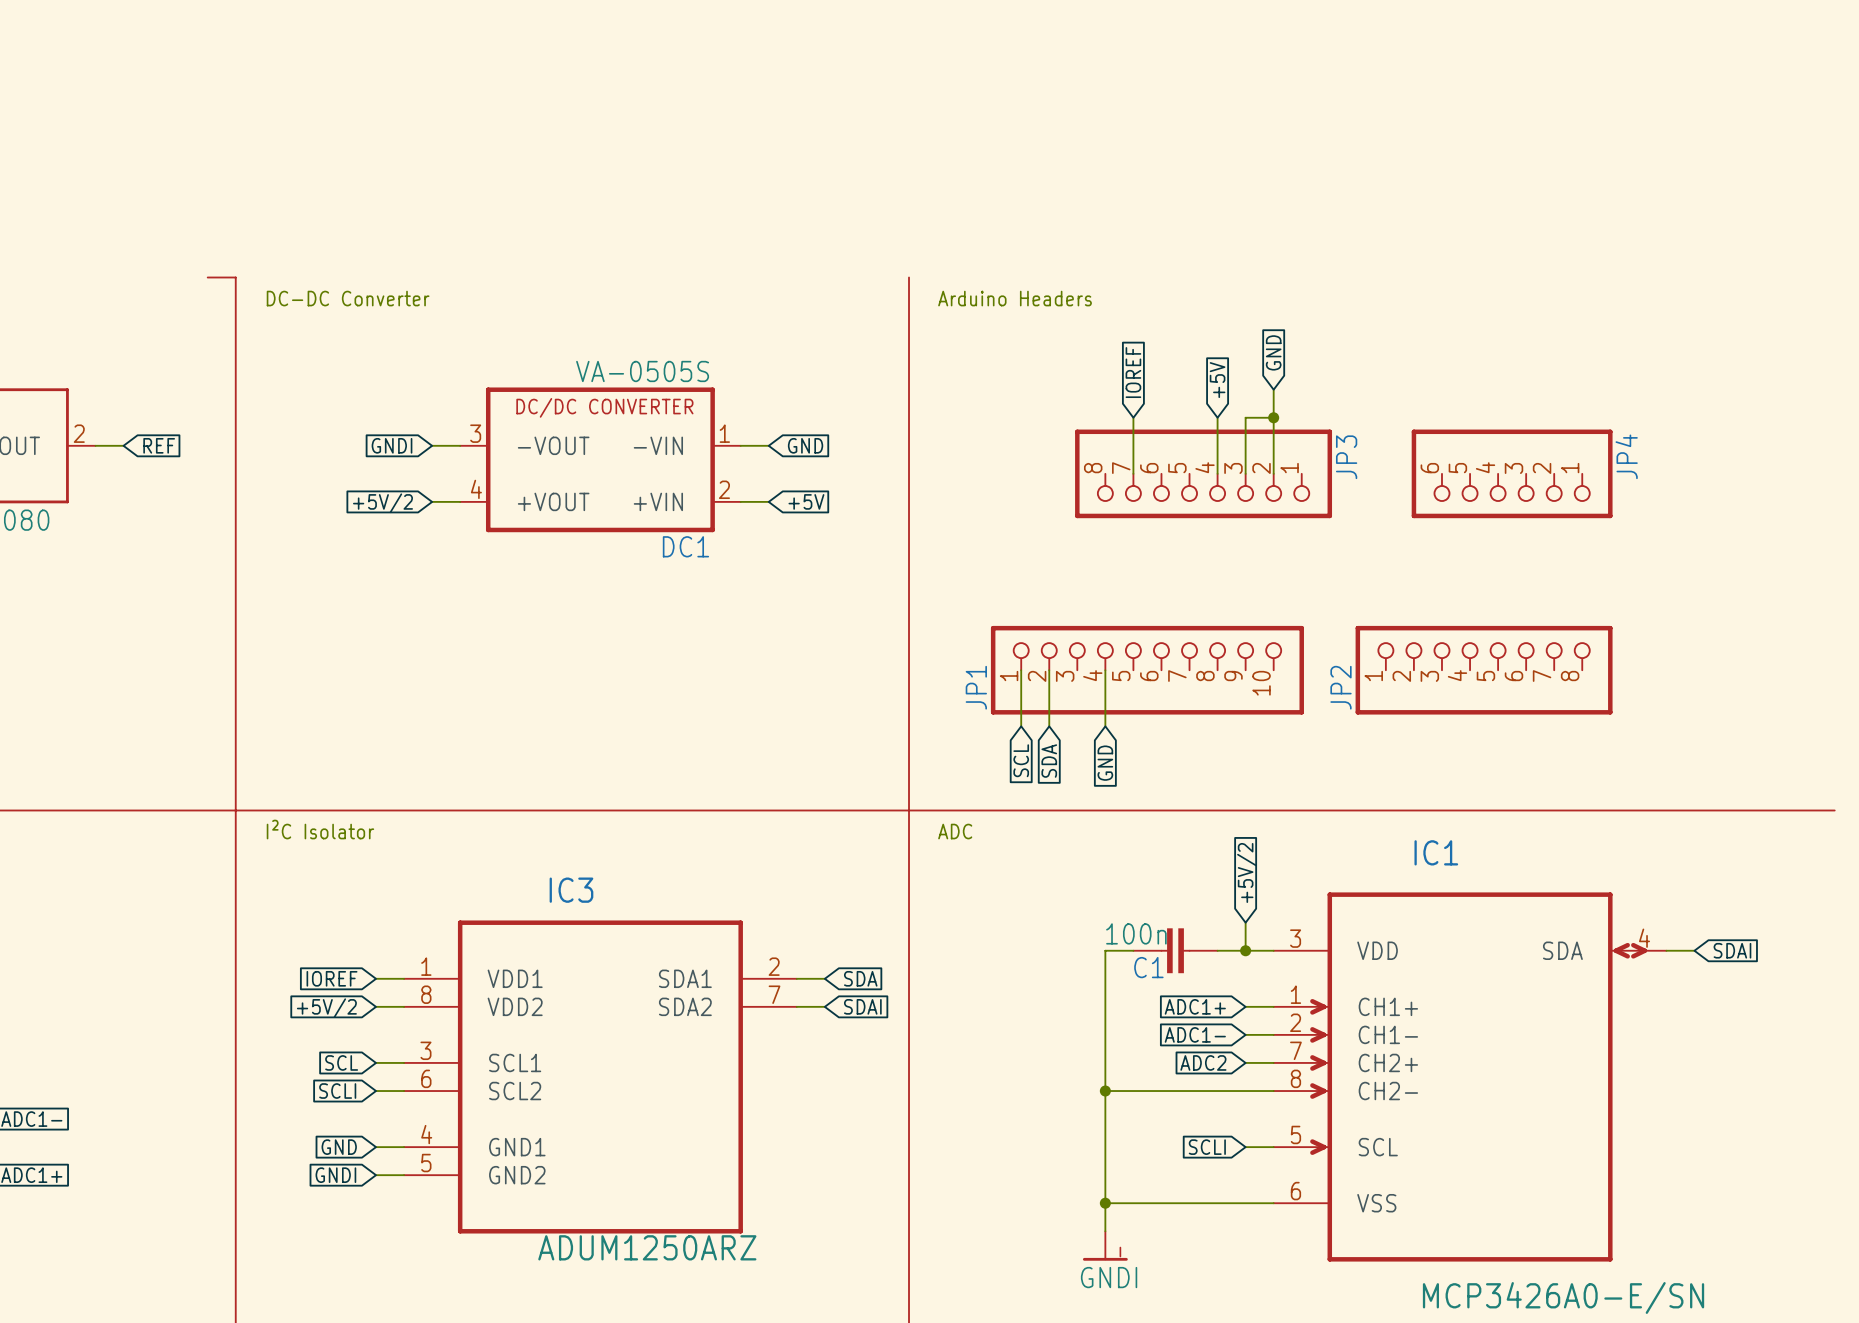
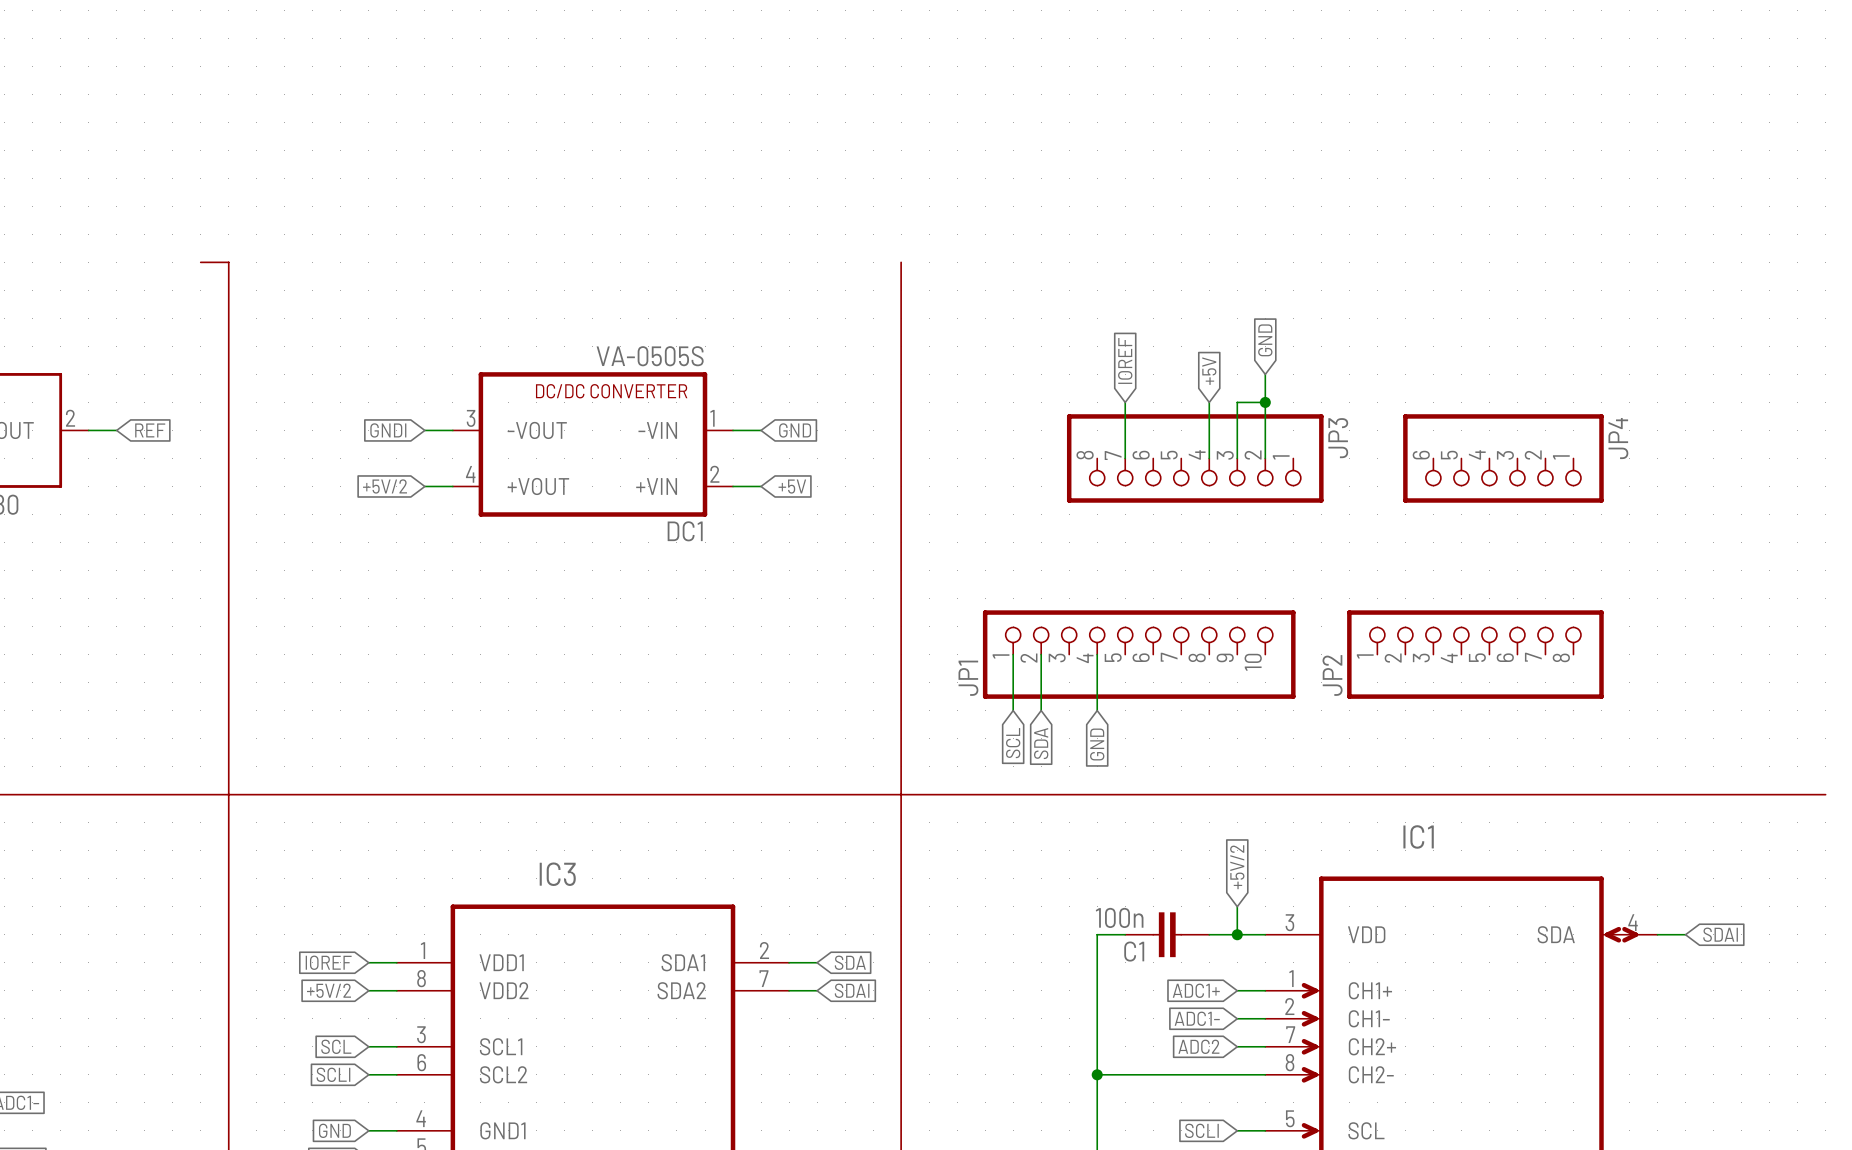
text: DC-DC Converter (348, 298) -> none
text: Arduino Headers (1015, 298) -> none
text: I²C Isolator (320, 829) -> none
text: ADC (955, 831) -> none

